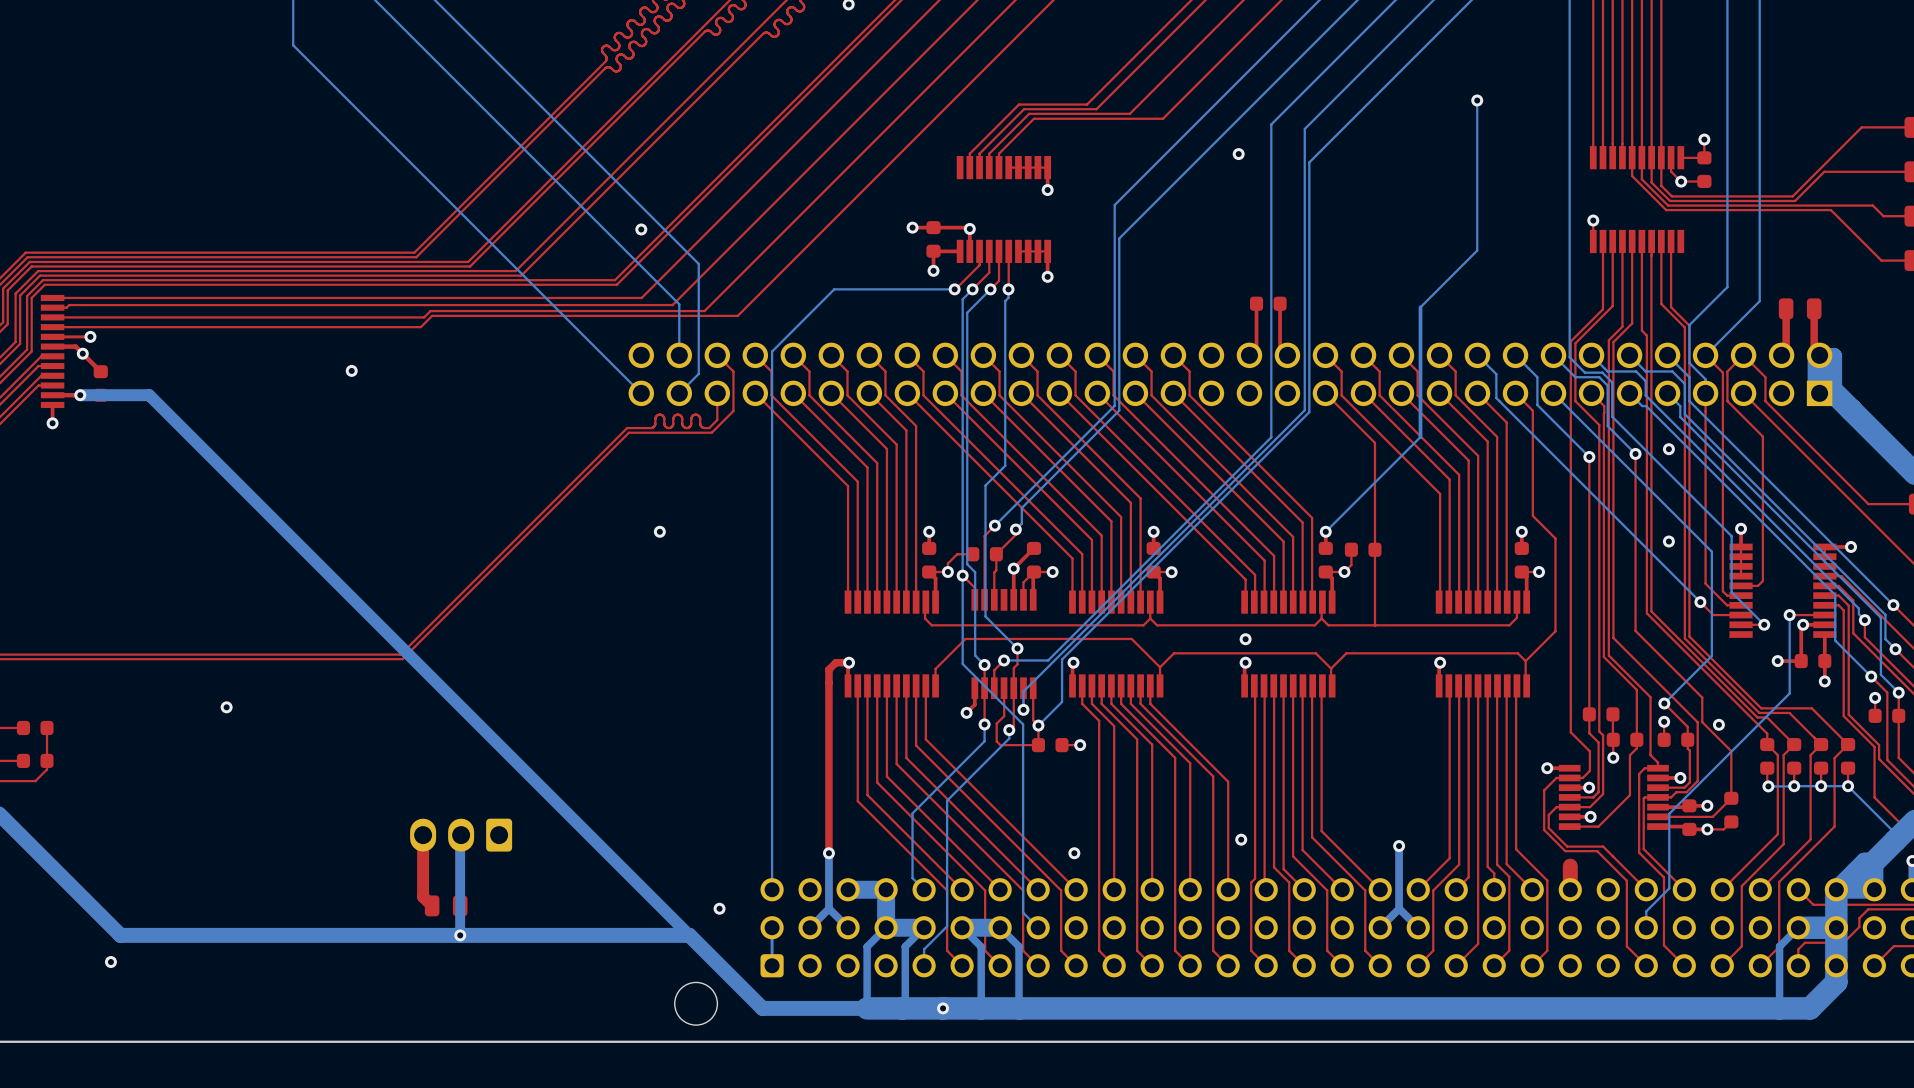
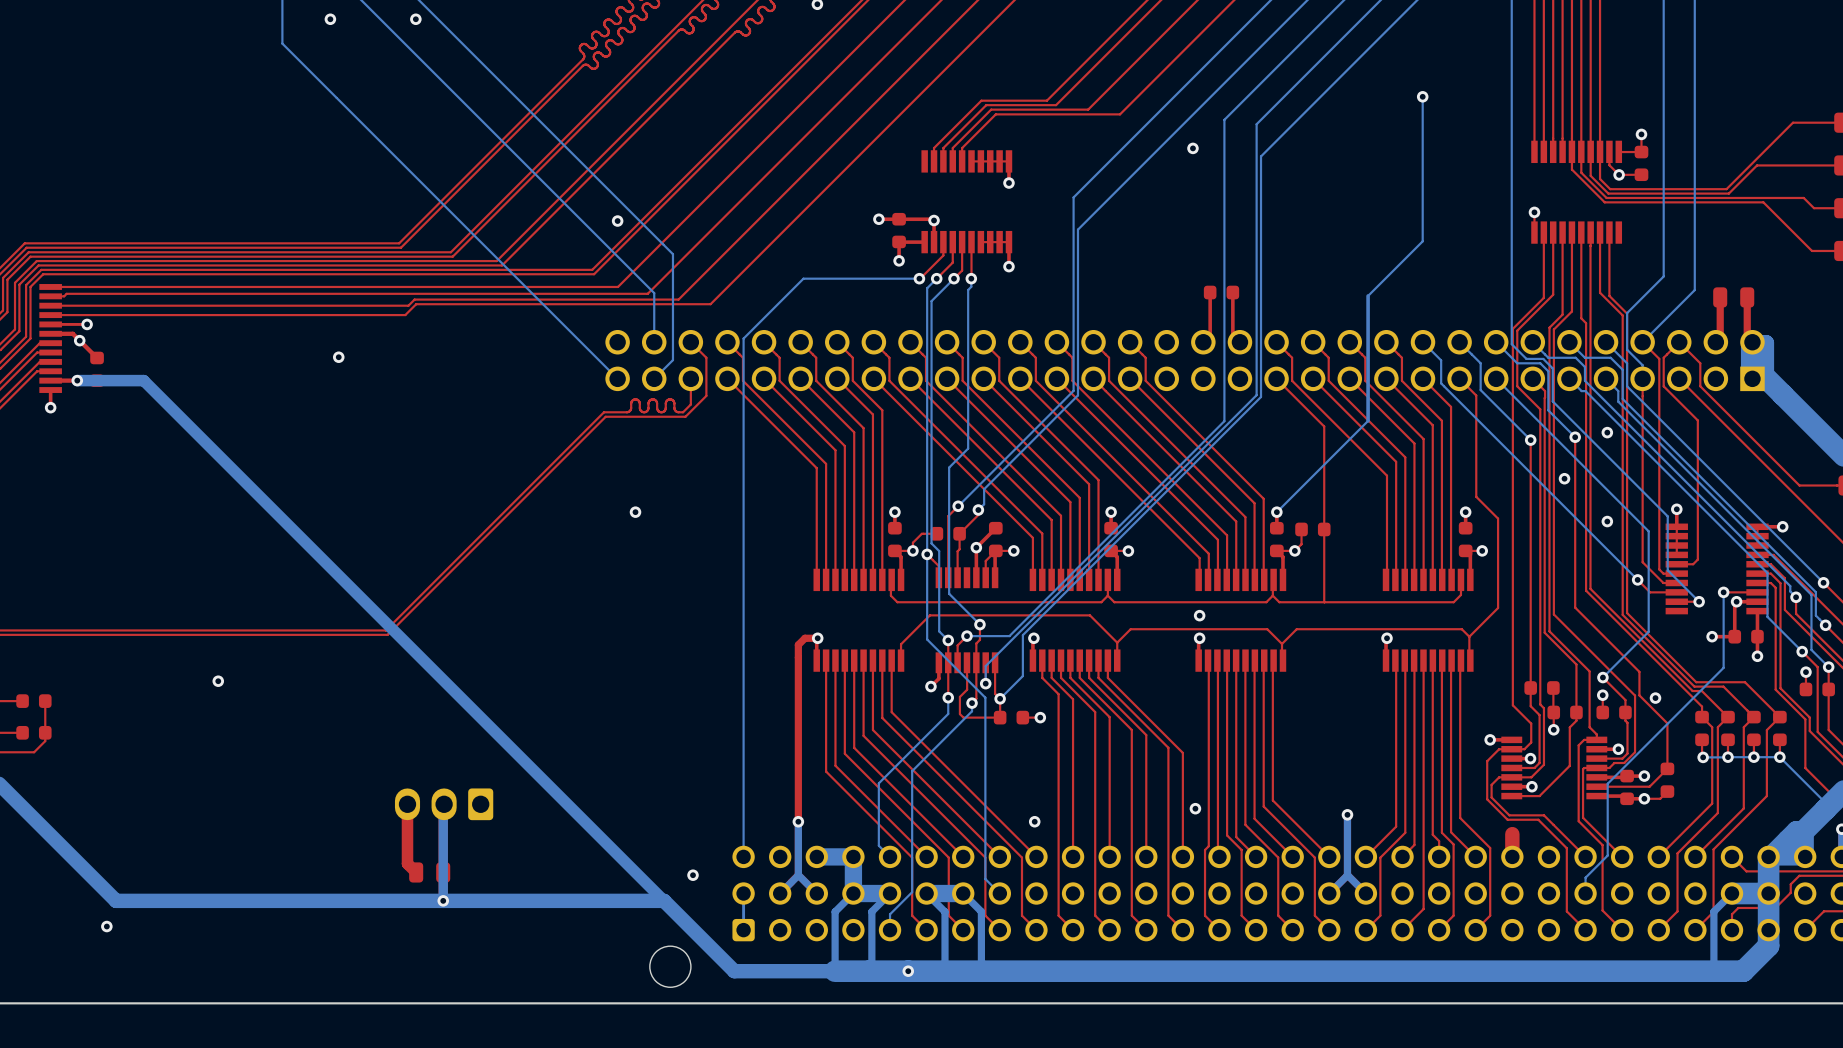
via: none -> (330, 19)
via: none -> (415, 19)
via: none -> (1564, 478)

